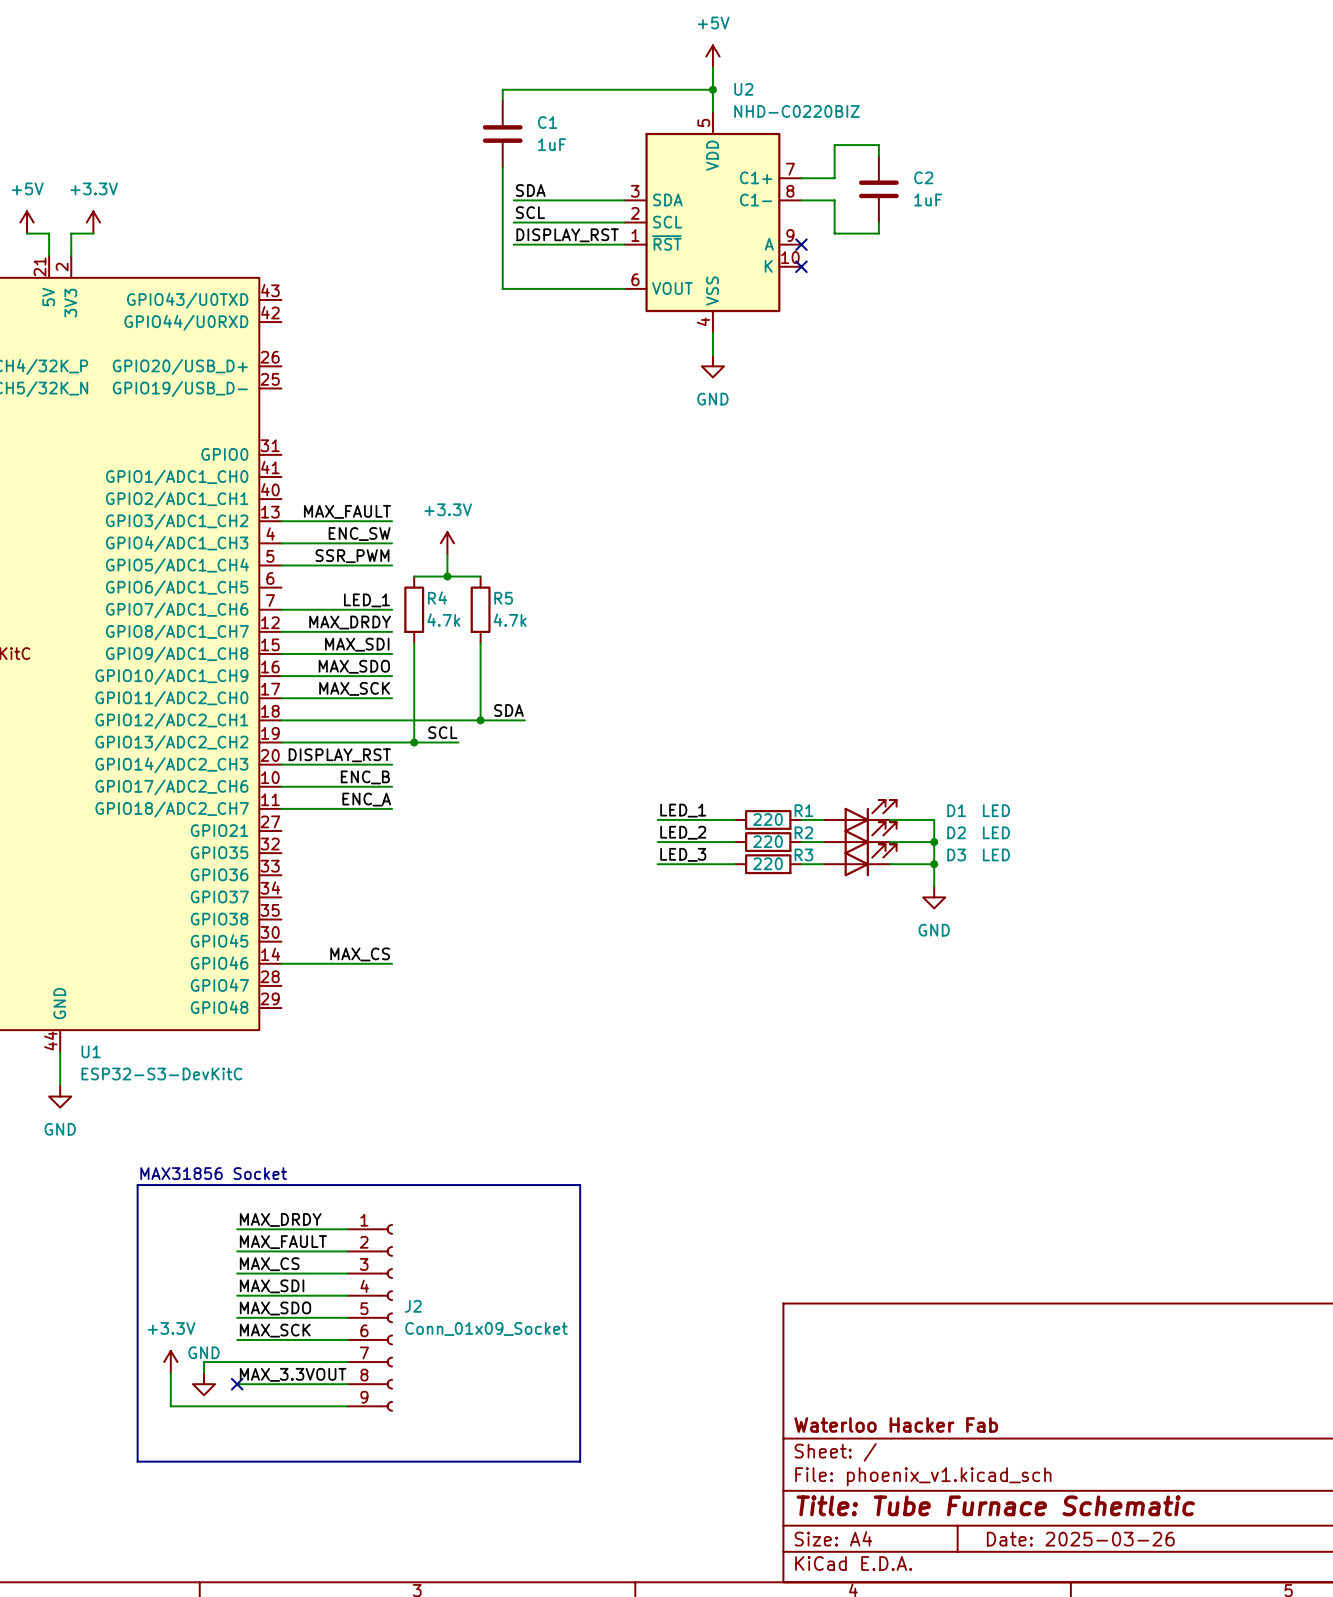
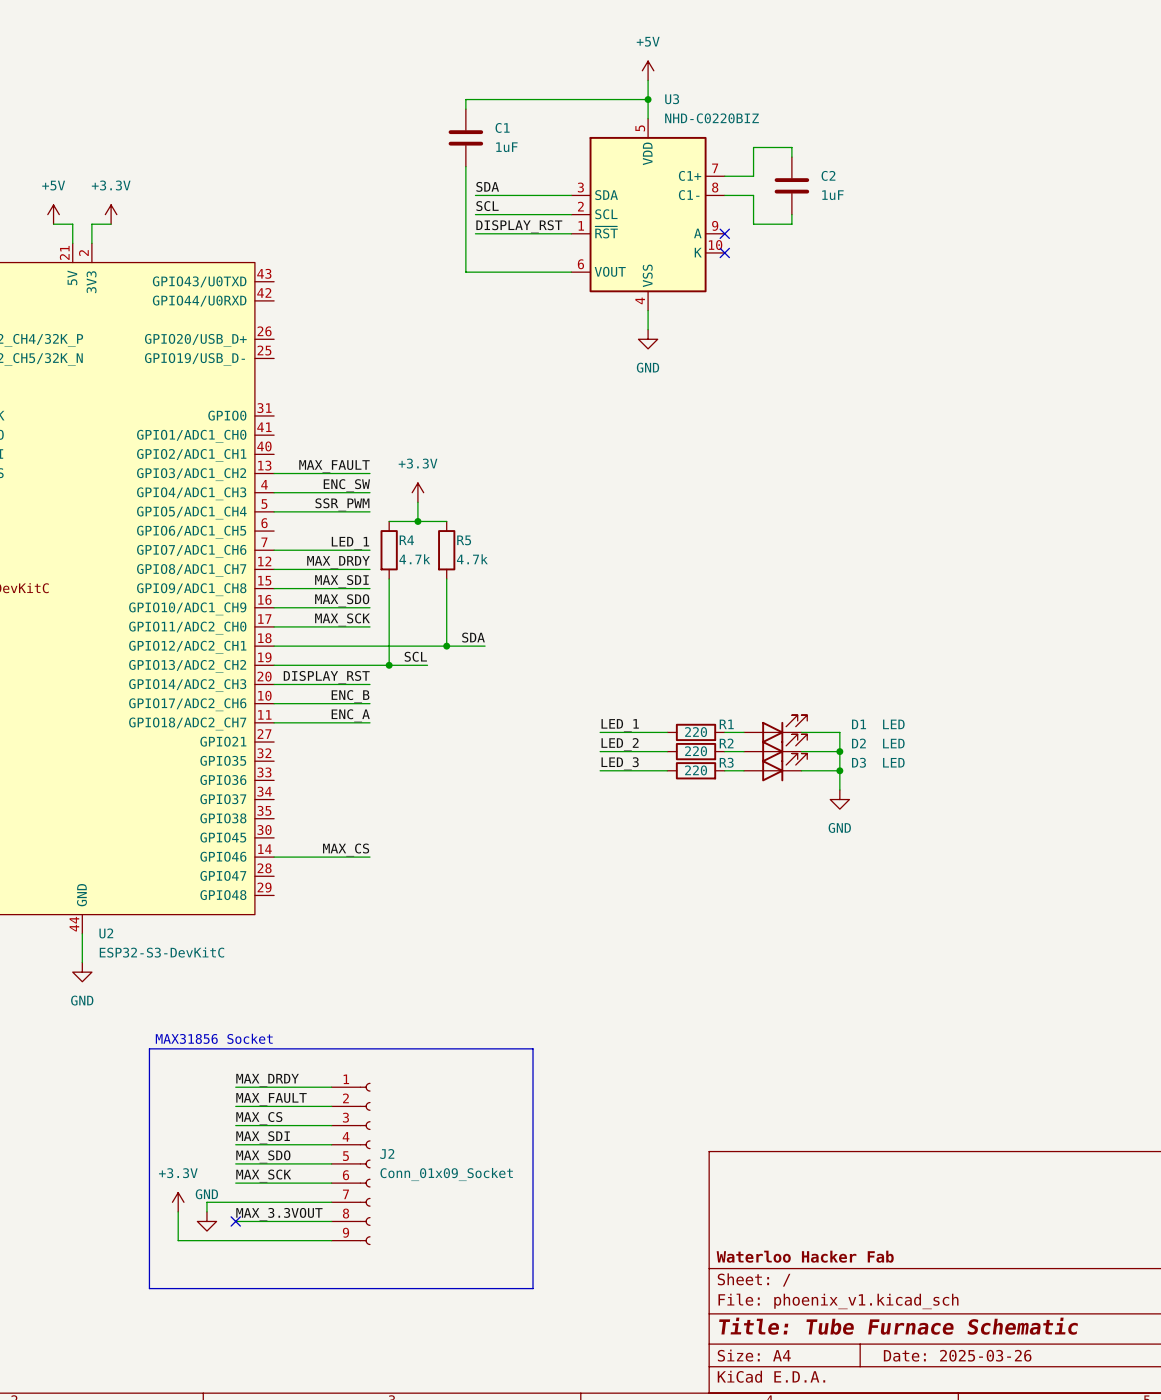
U2 name: U2 (743, 89) -> U3 (672, 99)
U1 name: U1 (91, 1051) -> U2 (106, 933)

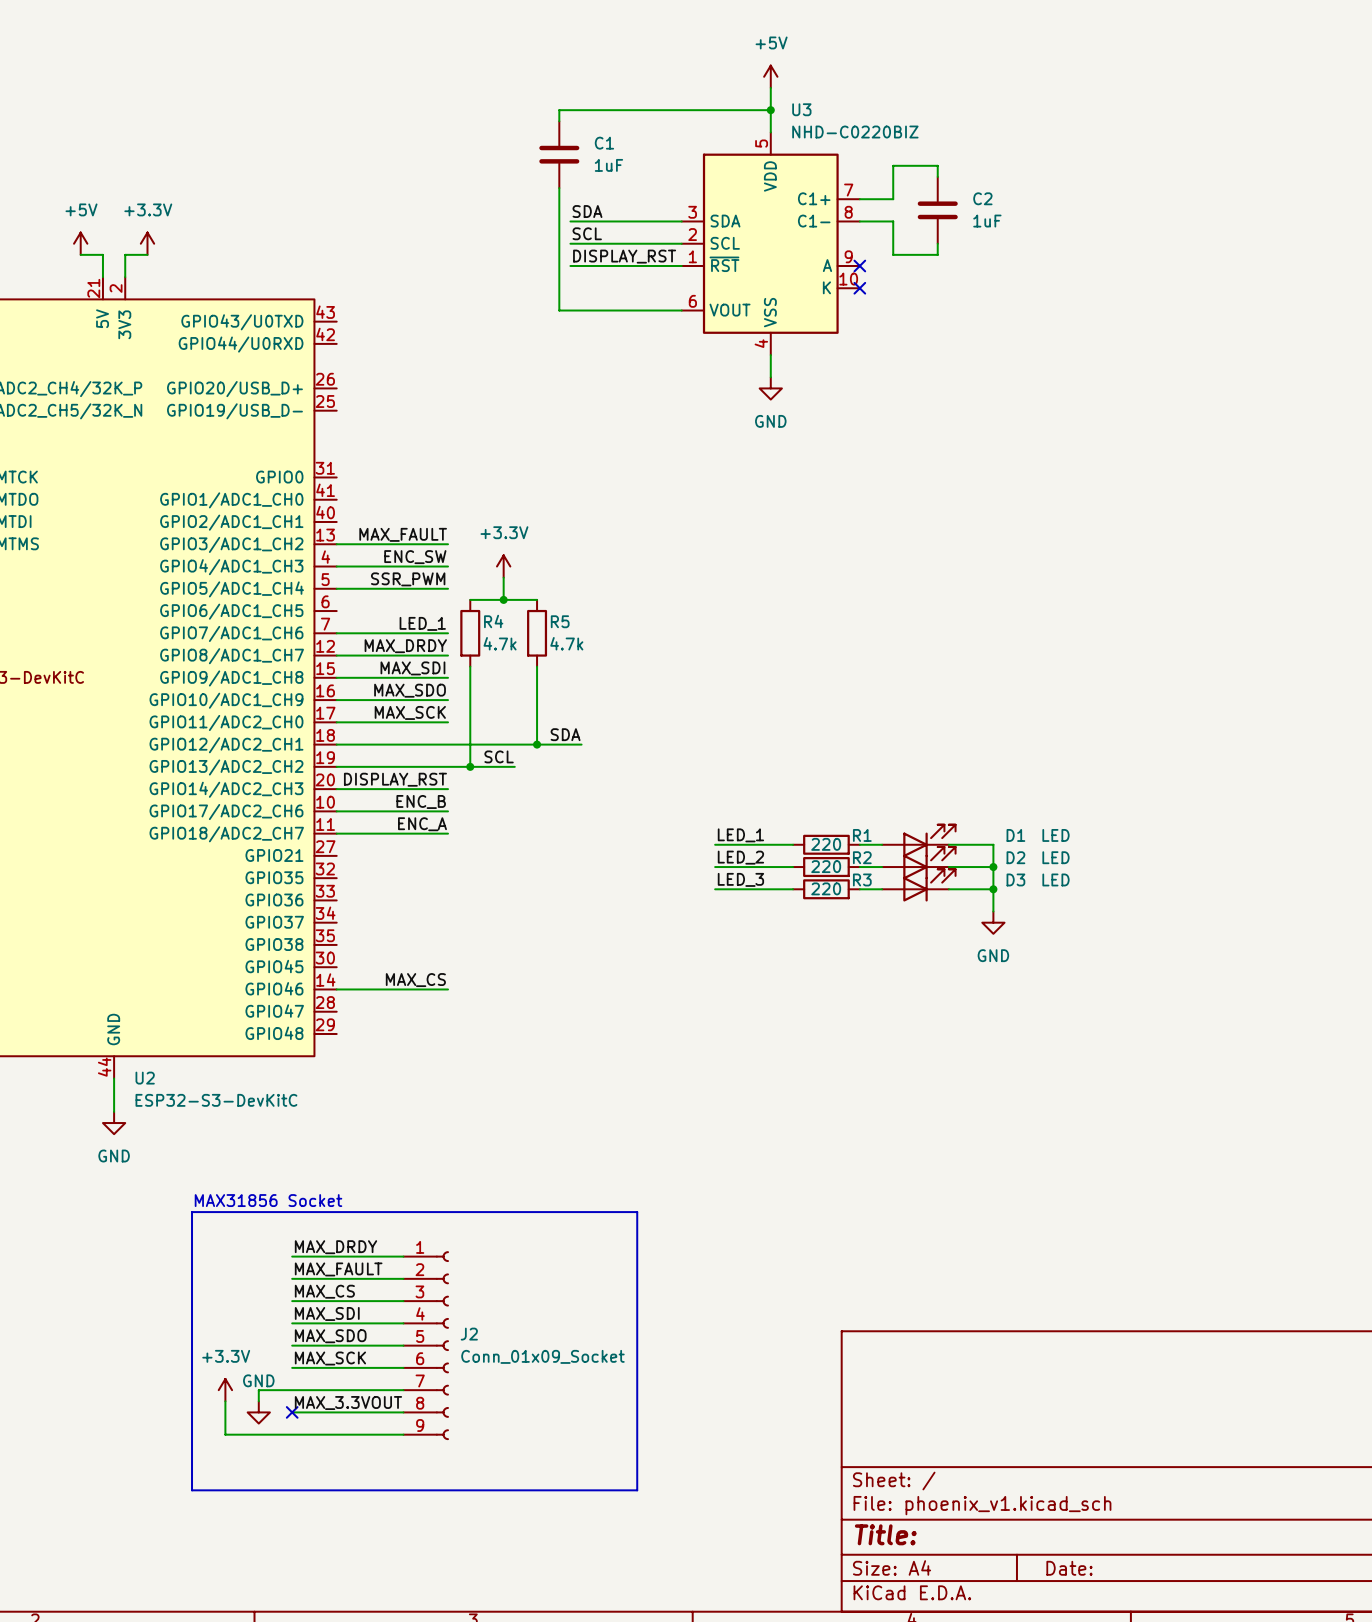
title block: Waterloo Hacker Fab (805, 1256) -> none
title block: Title: Tube Furnace Schematic (898, 1326) -> Title: (885, 1534)
title block: Date: 2025-03-26 (957, 1355) -> Date: (1069, 1568)

